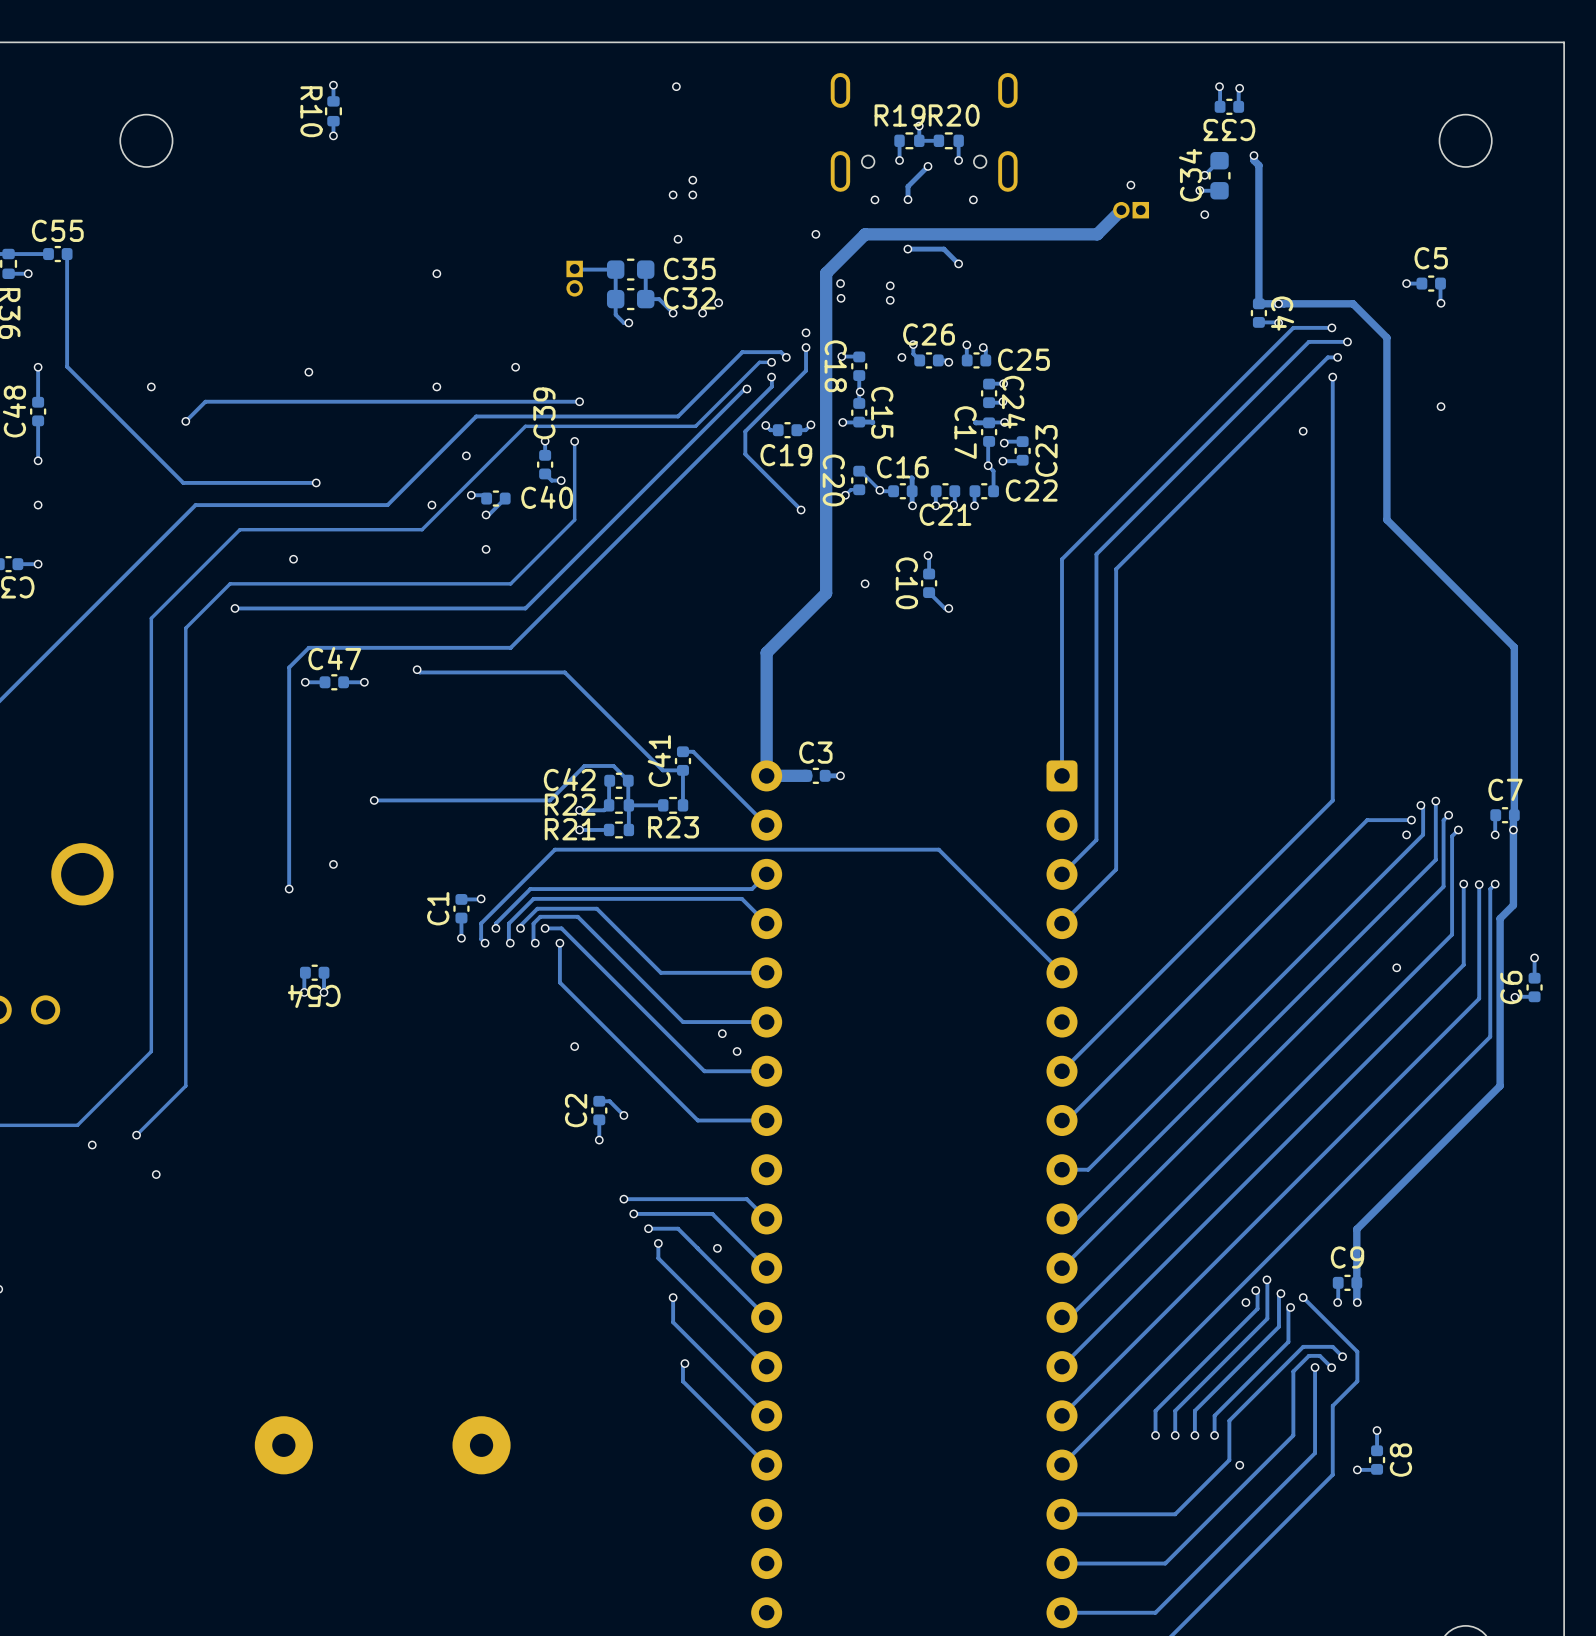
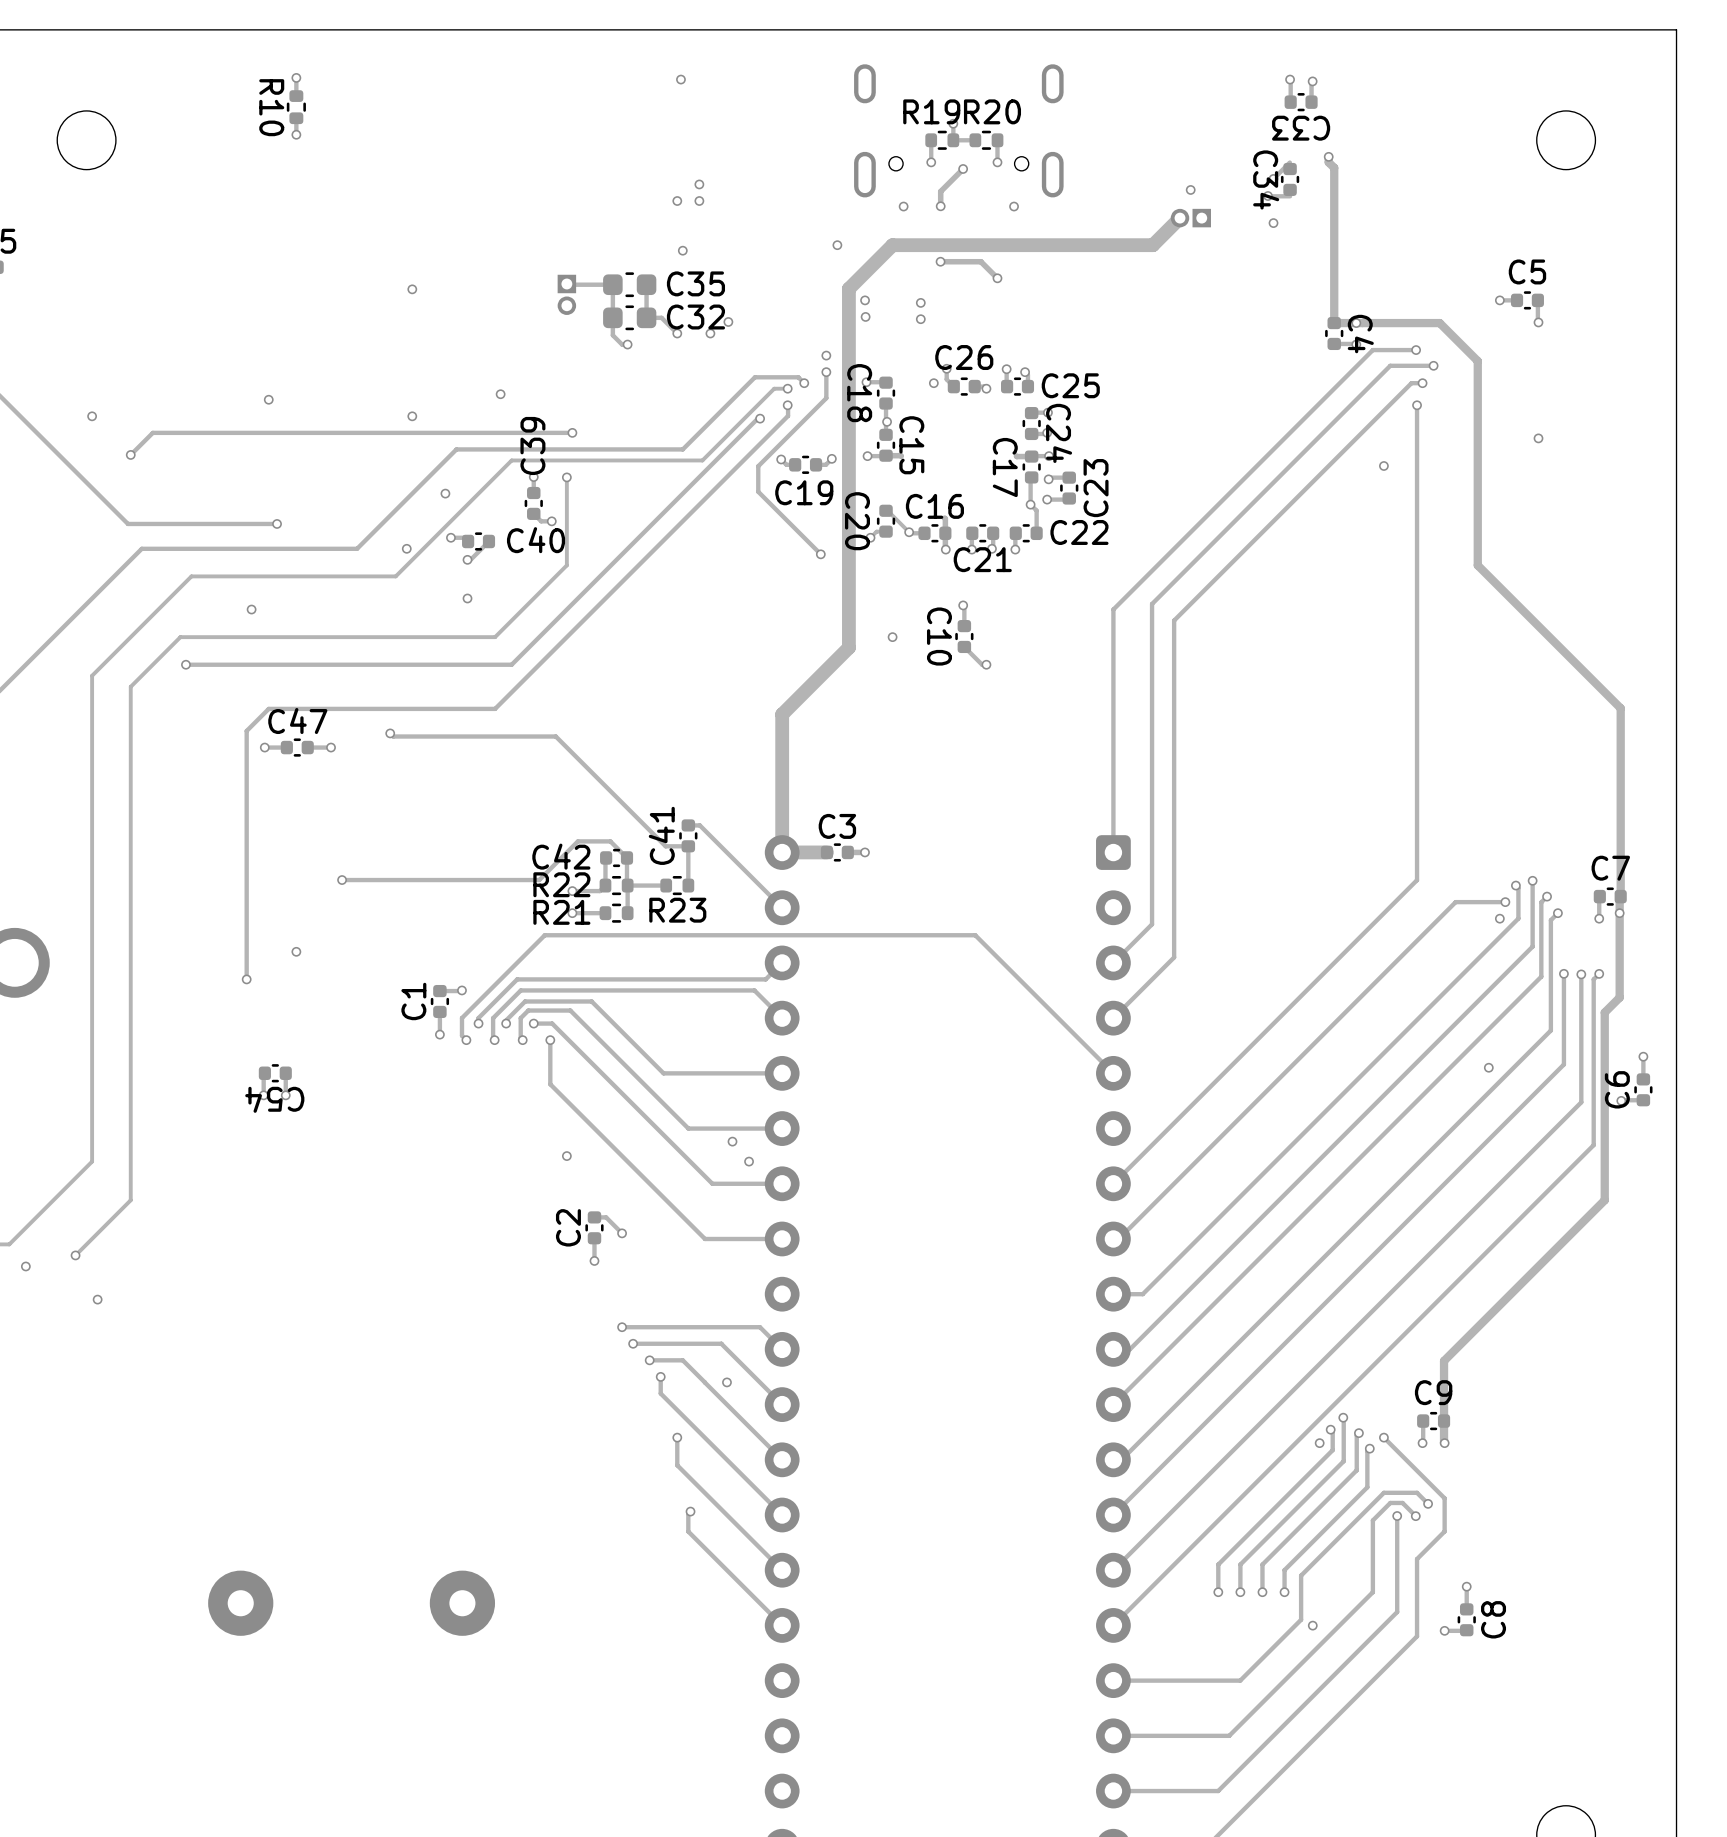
C34 footprint: [1208, 152, 1231, 200] -> [1280, 162, 1300, 196]
C34 name rotation: 0° (1190, 175) -> 180° (1266, 179)

